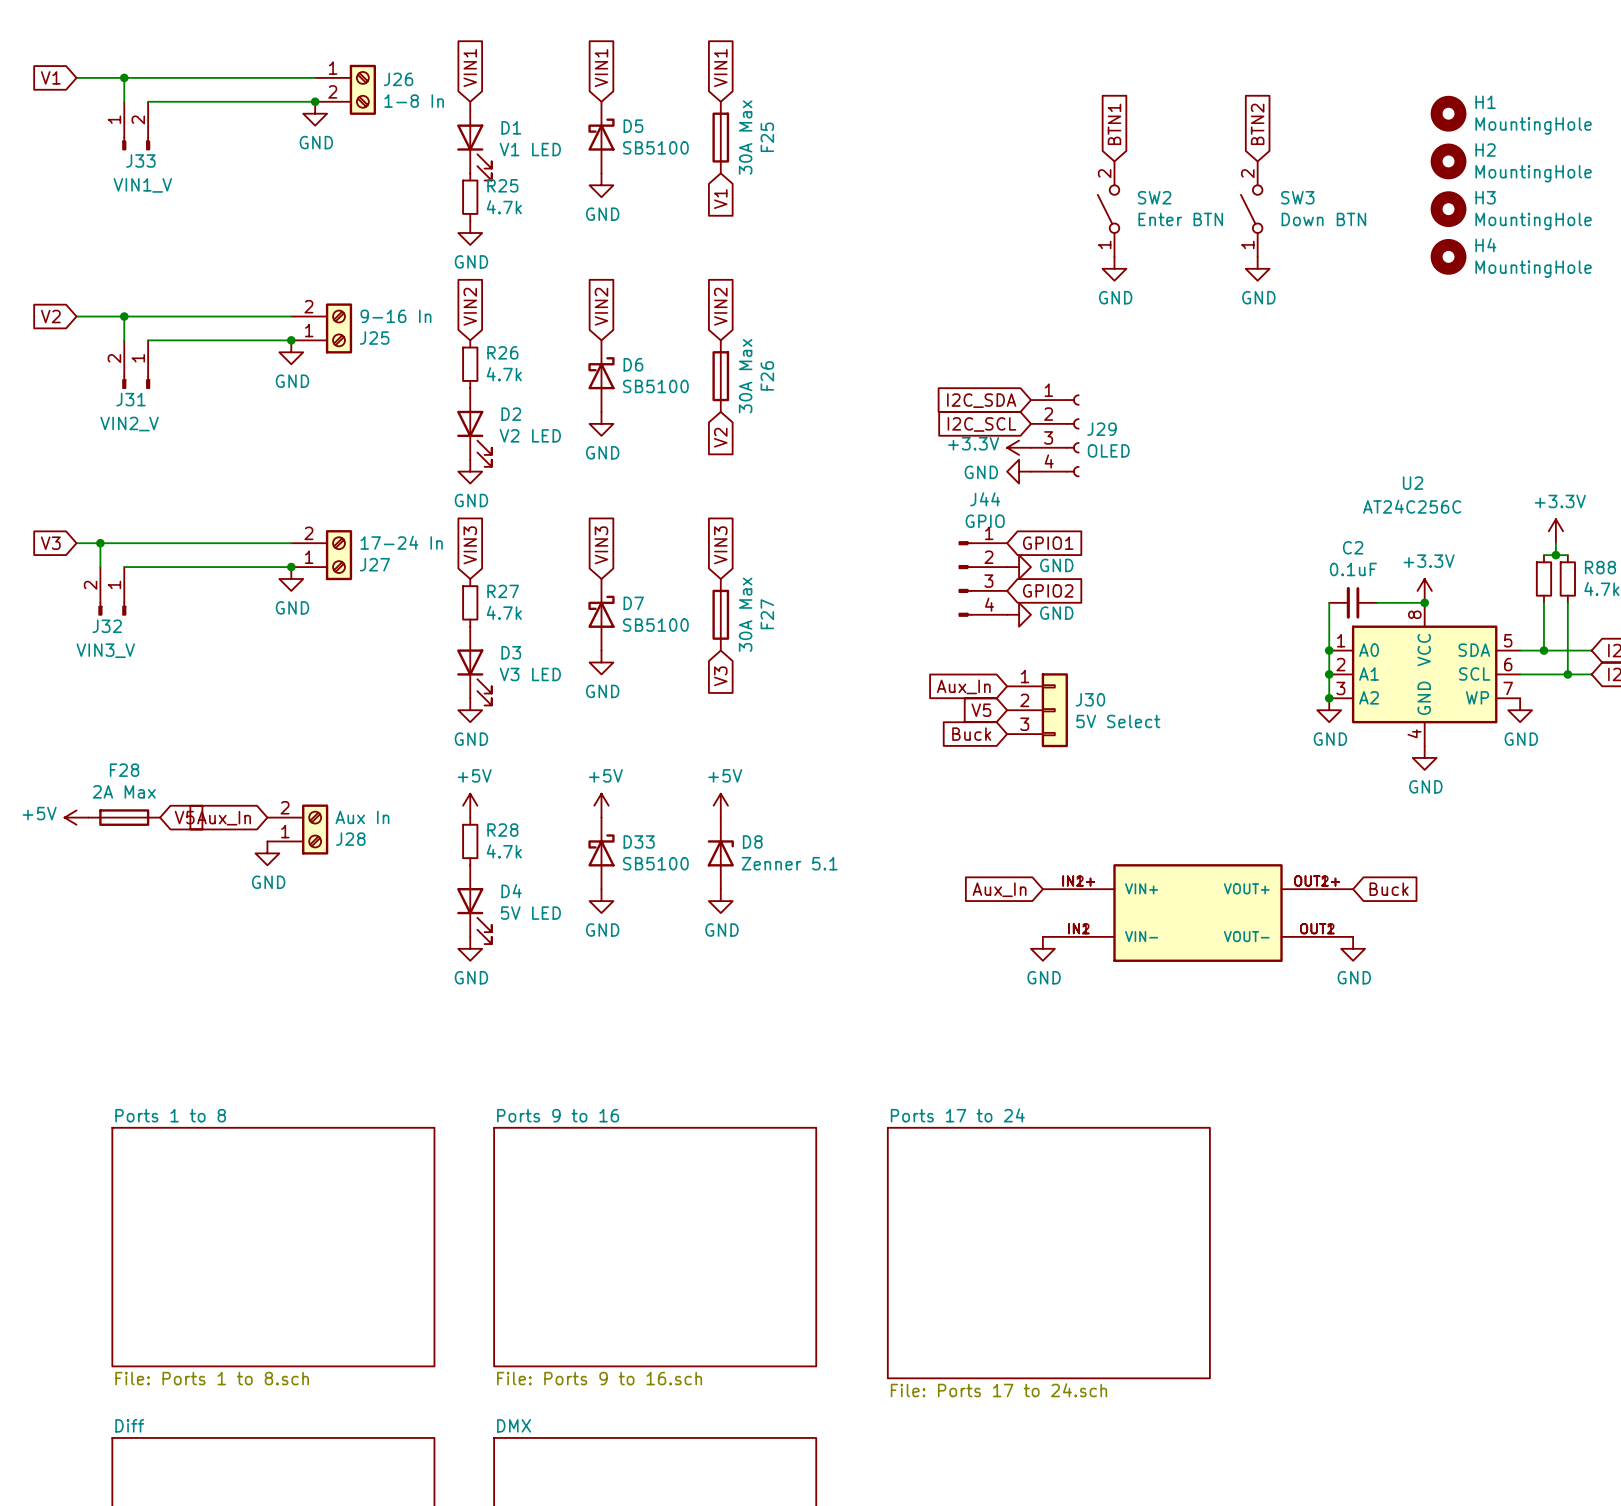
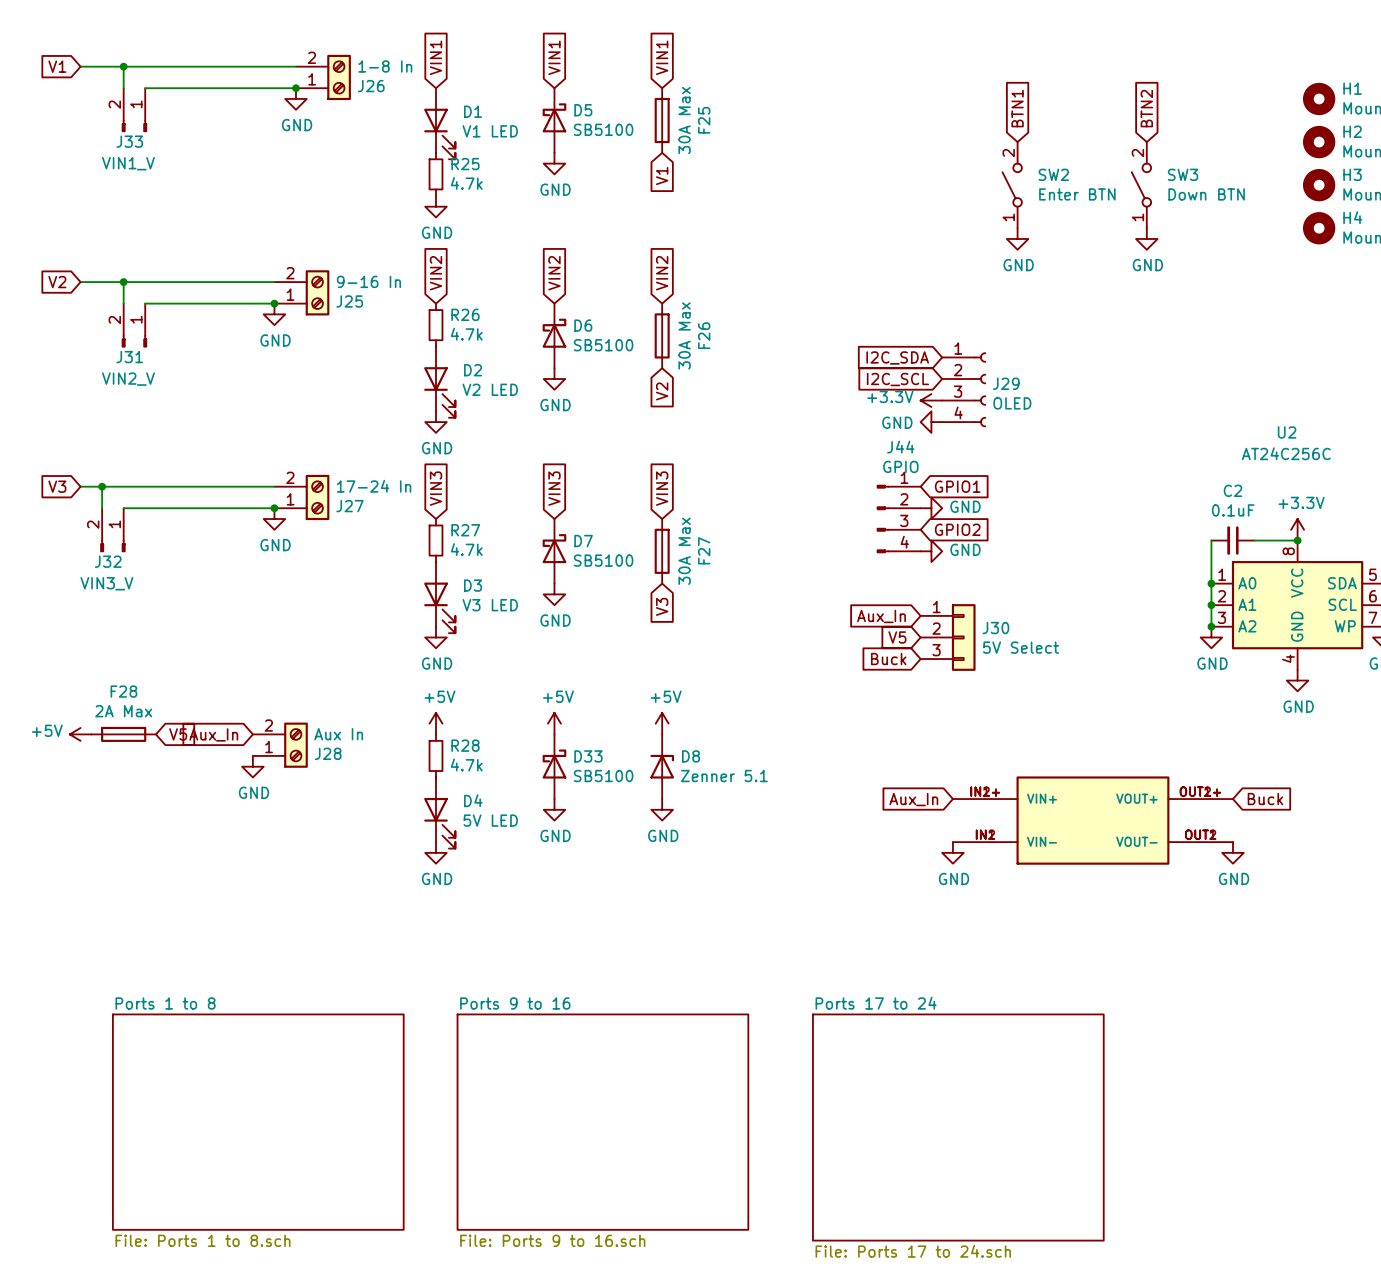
J26 flip: as is (362, 89) -> up-down (339, 77)
J33 flip: as is (136, 143) -> left-right (134, 125)

